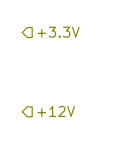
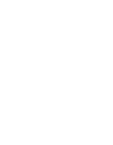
hierarchical label: +3.3V (58, 32) -> none
hierarchical label: +12V (56, 111) -> none

